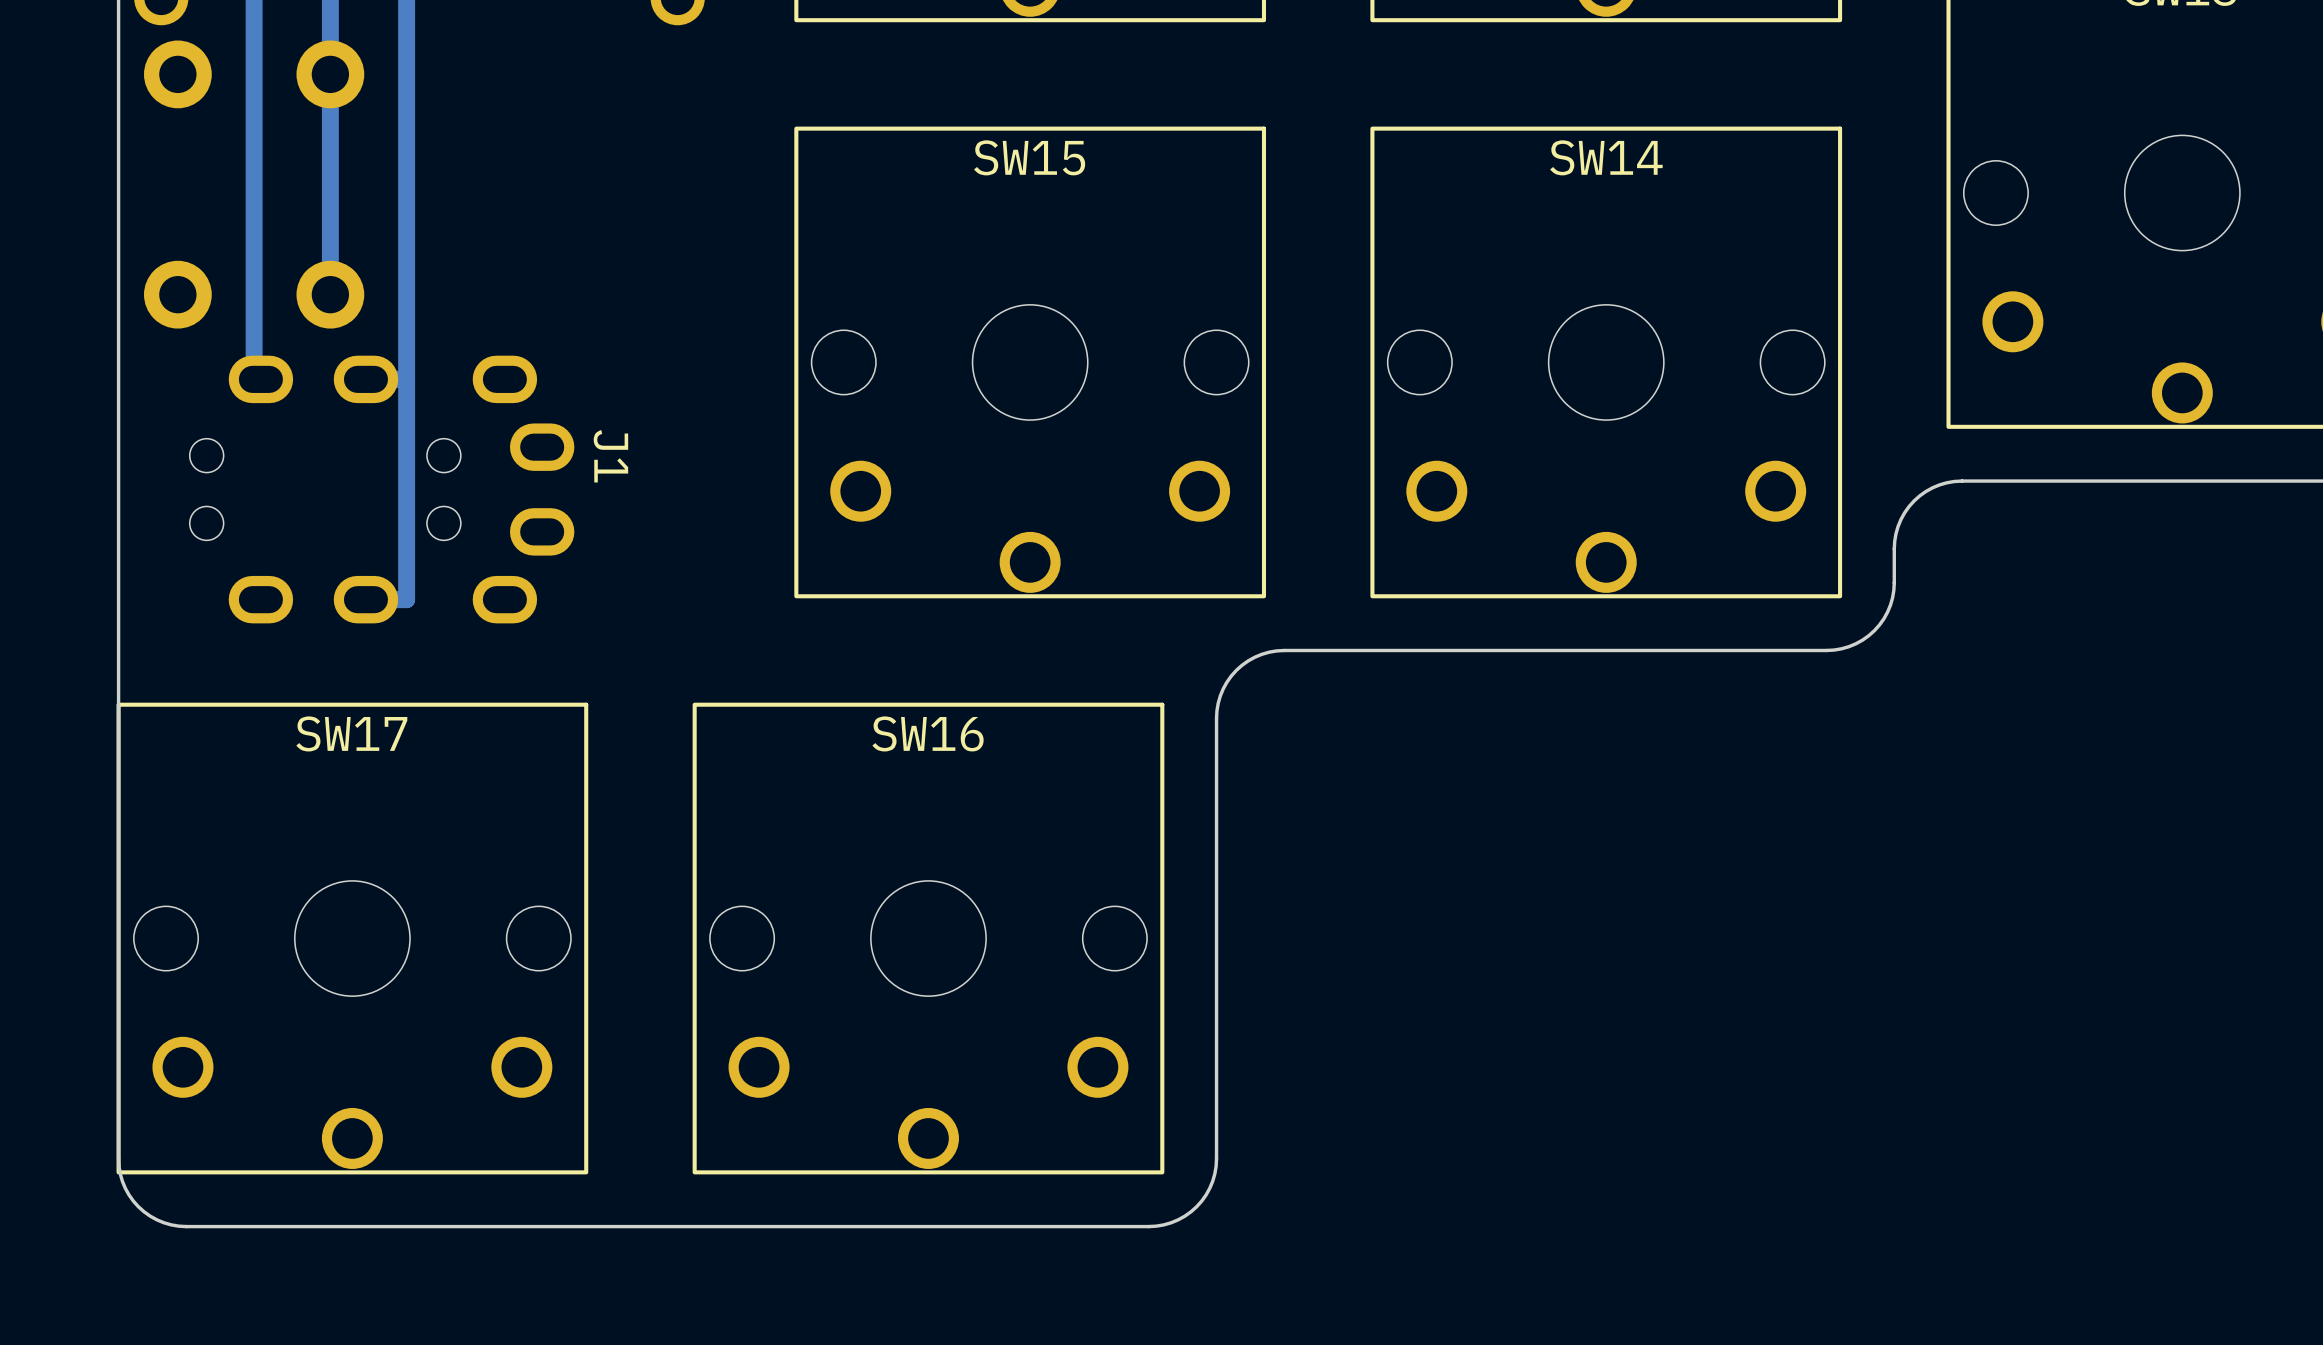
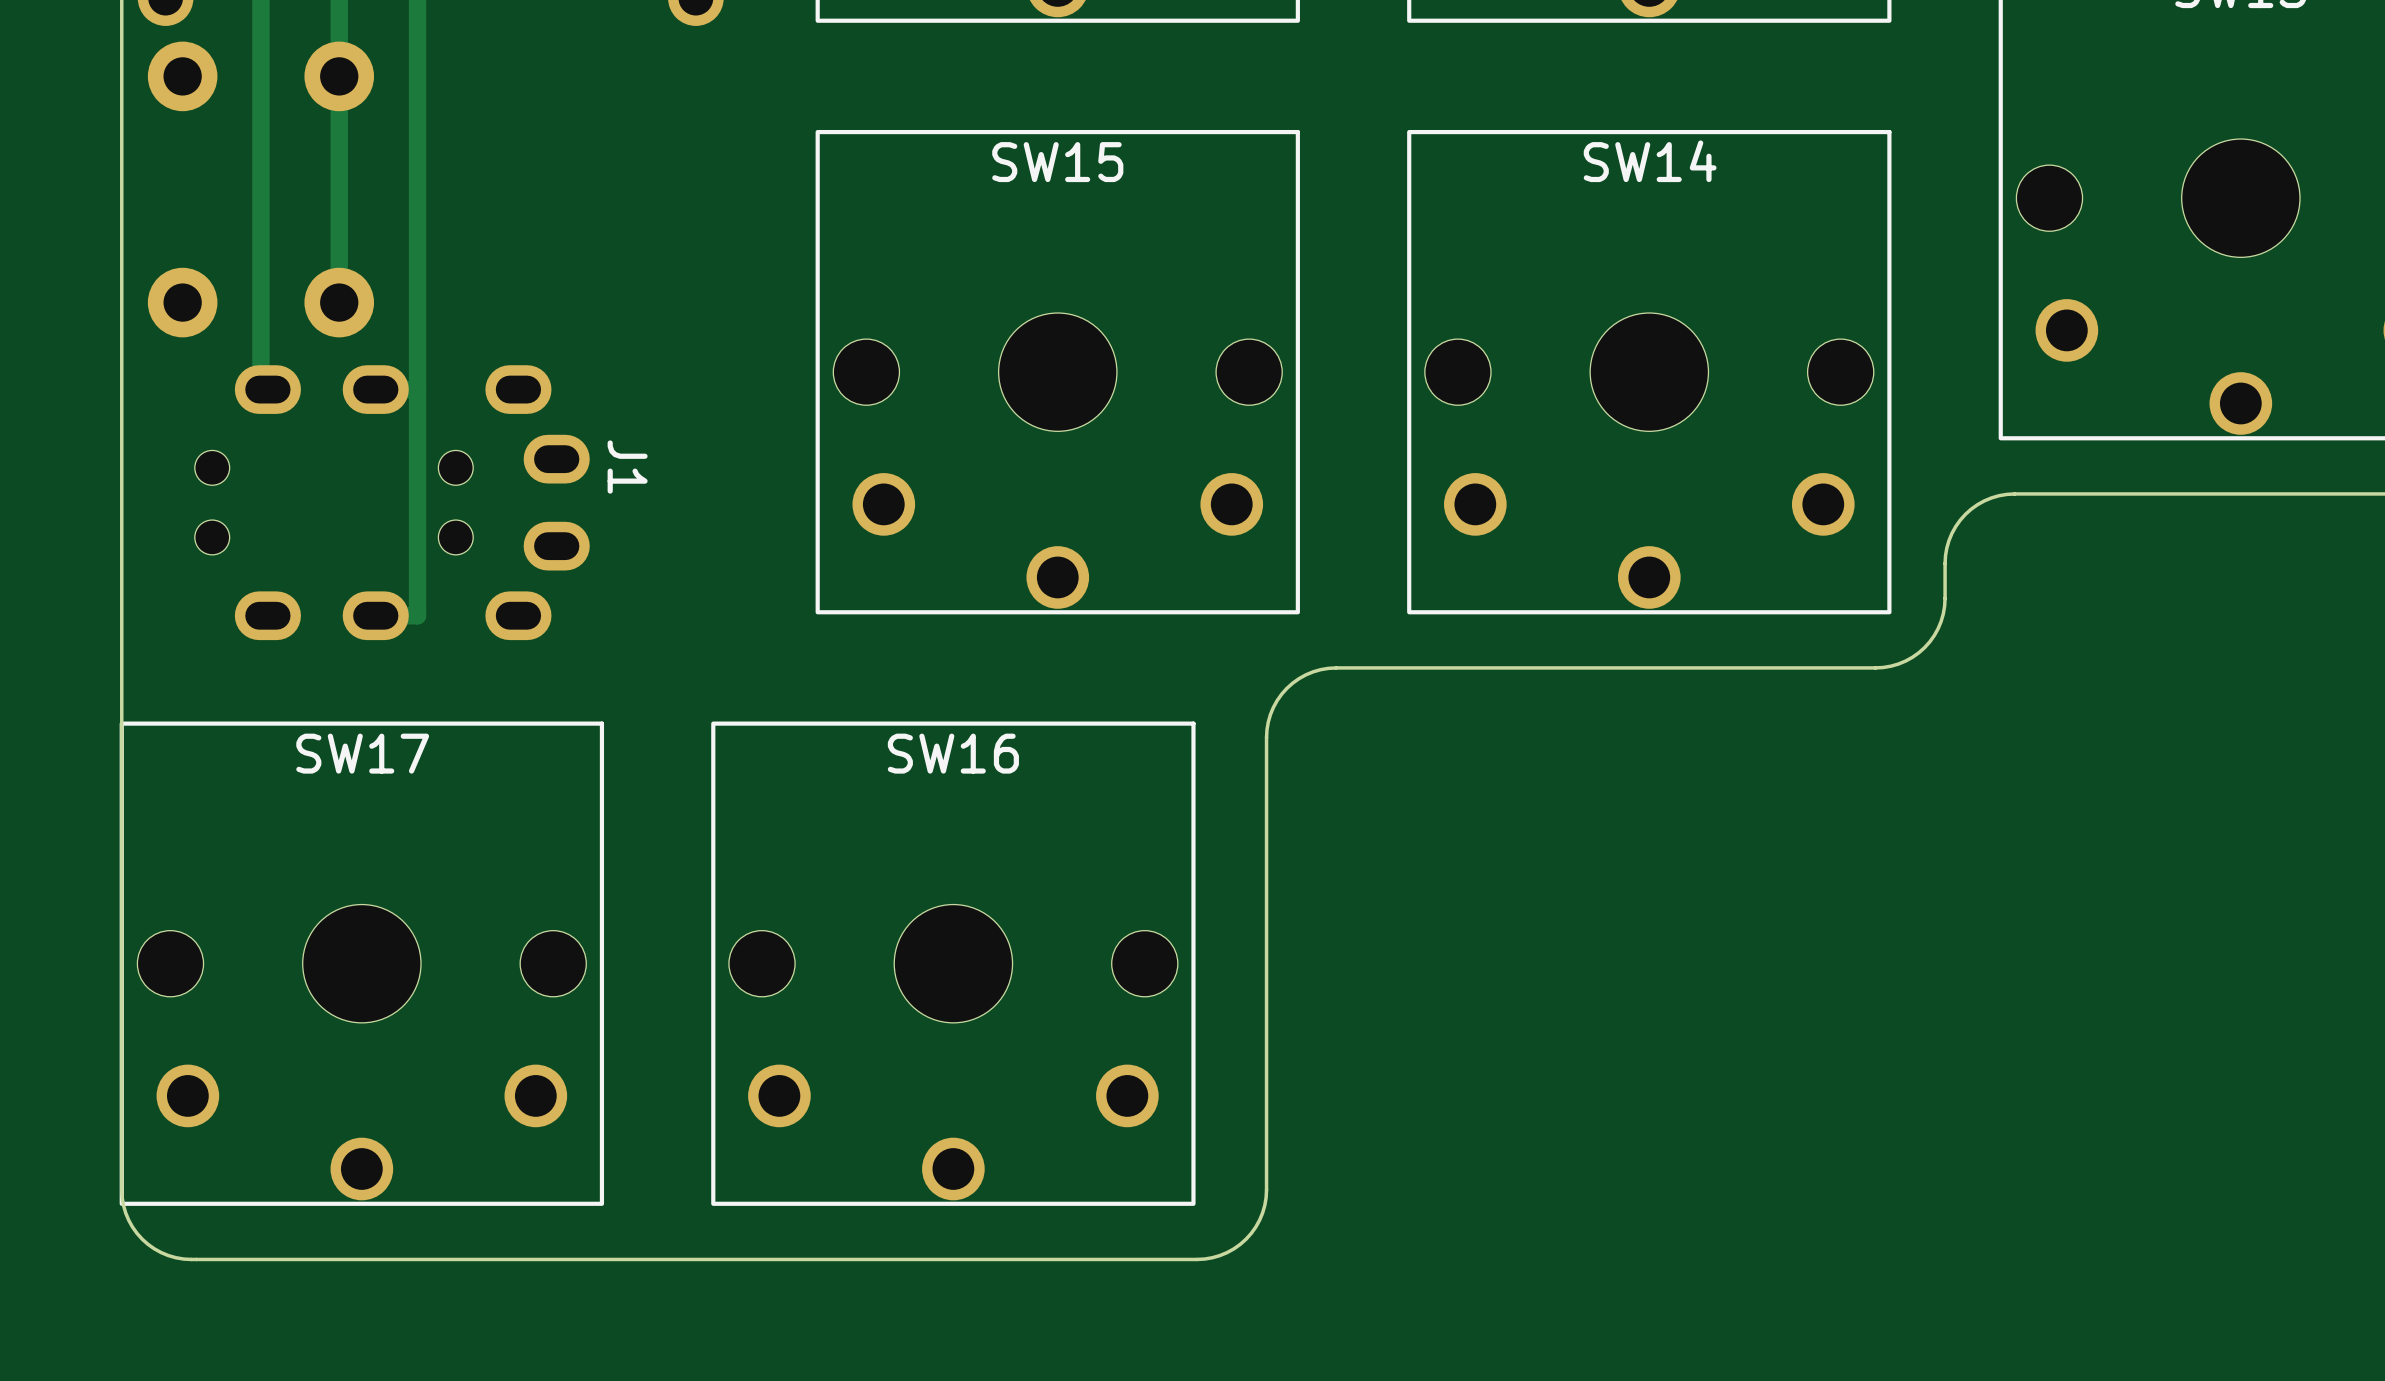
board edge: (1301, 650) (1269, 652) (1248, 660) (1231, 676) (1223, 688) (1218, 703) (1216, 718) (1216, 1166) (1209, 1188) (1196, 1206) (1178, 1219) (1163, 1224) (1148, 1226) -> (1336, 667) (1313, 671) (1292, 683) (1277, 700) (1270, 714) (1266, 729) (1266, 1189) (1264, 1205) (1259, 1220) (1251, 1233) (1233, 1248) (1212, 1257) (1179, 1259)

